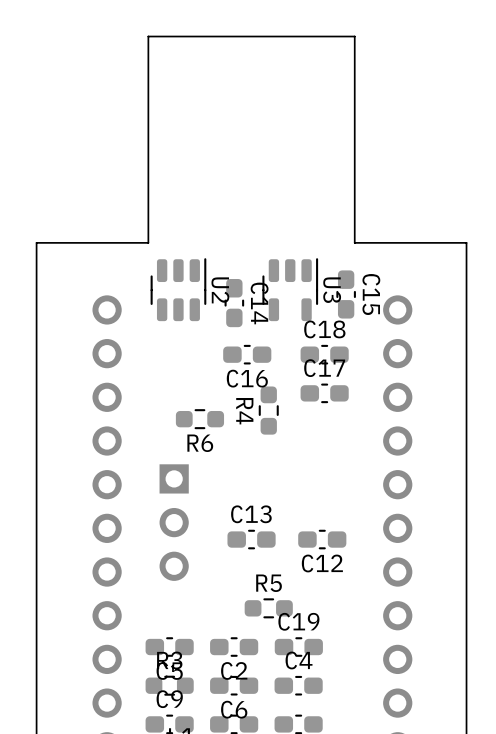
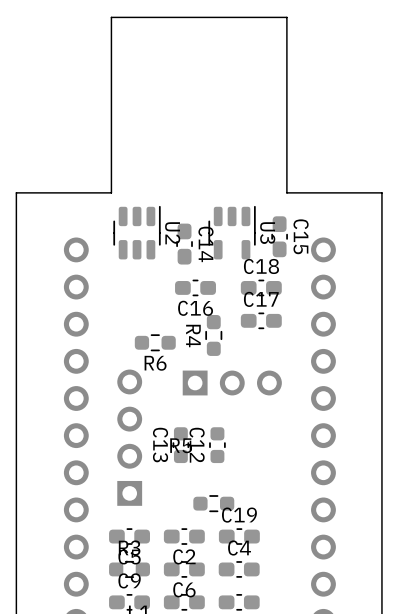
part footprint: [159, 464, 189, 581] -> [117, 369, 143, 506]
part: none -> (232, 382)
C13 name position: C13 (251, 514) -> C13 (160, 445)
C13 footprint: [227, 529, 276, 550] -> [172, 427, 190, 464]
C12 footprint: [298, 529, 347, 550] -> [209, 427, 226, 464]
C12 name position: C12 (322, 563) -> C12 (197, 445)
R5 name position: R5 (269, 583) -> R5 (181, 445)

